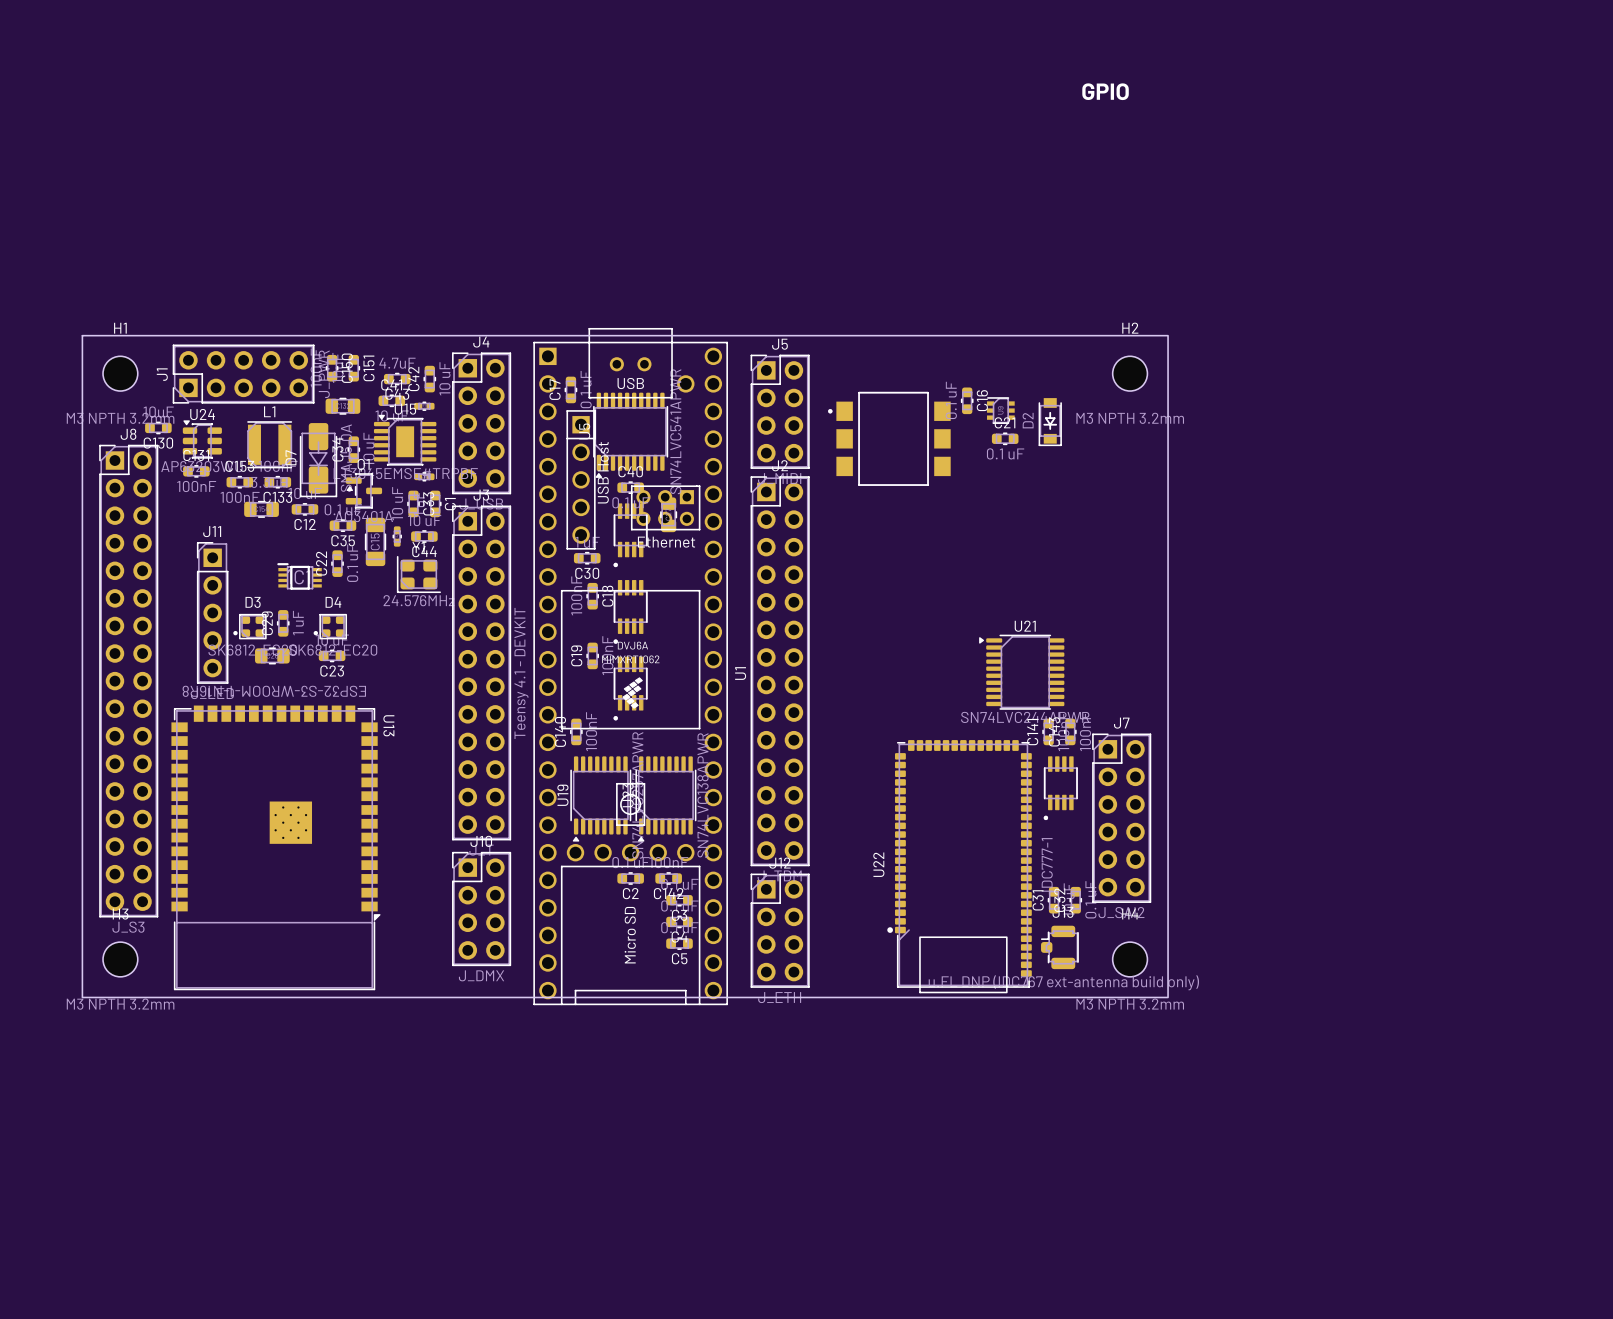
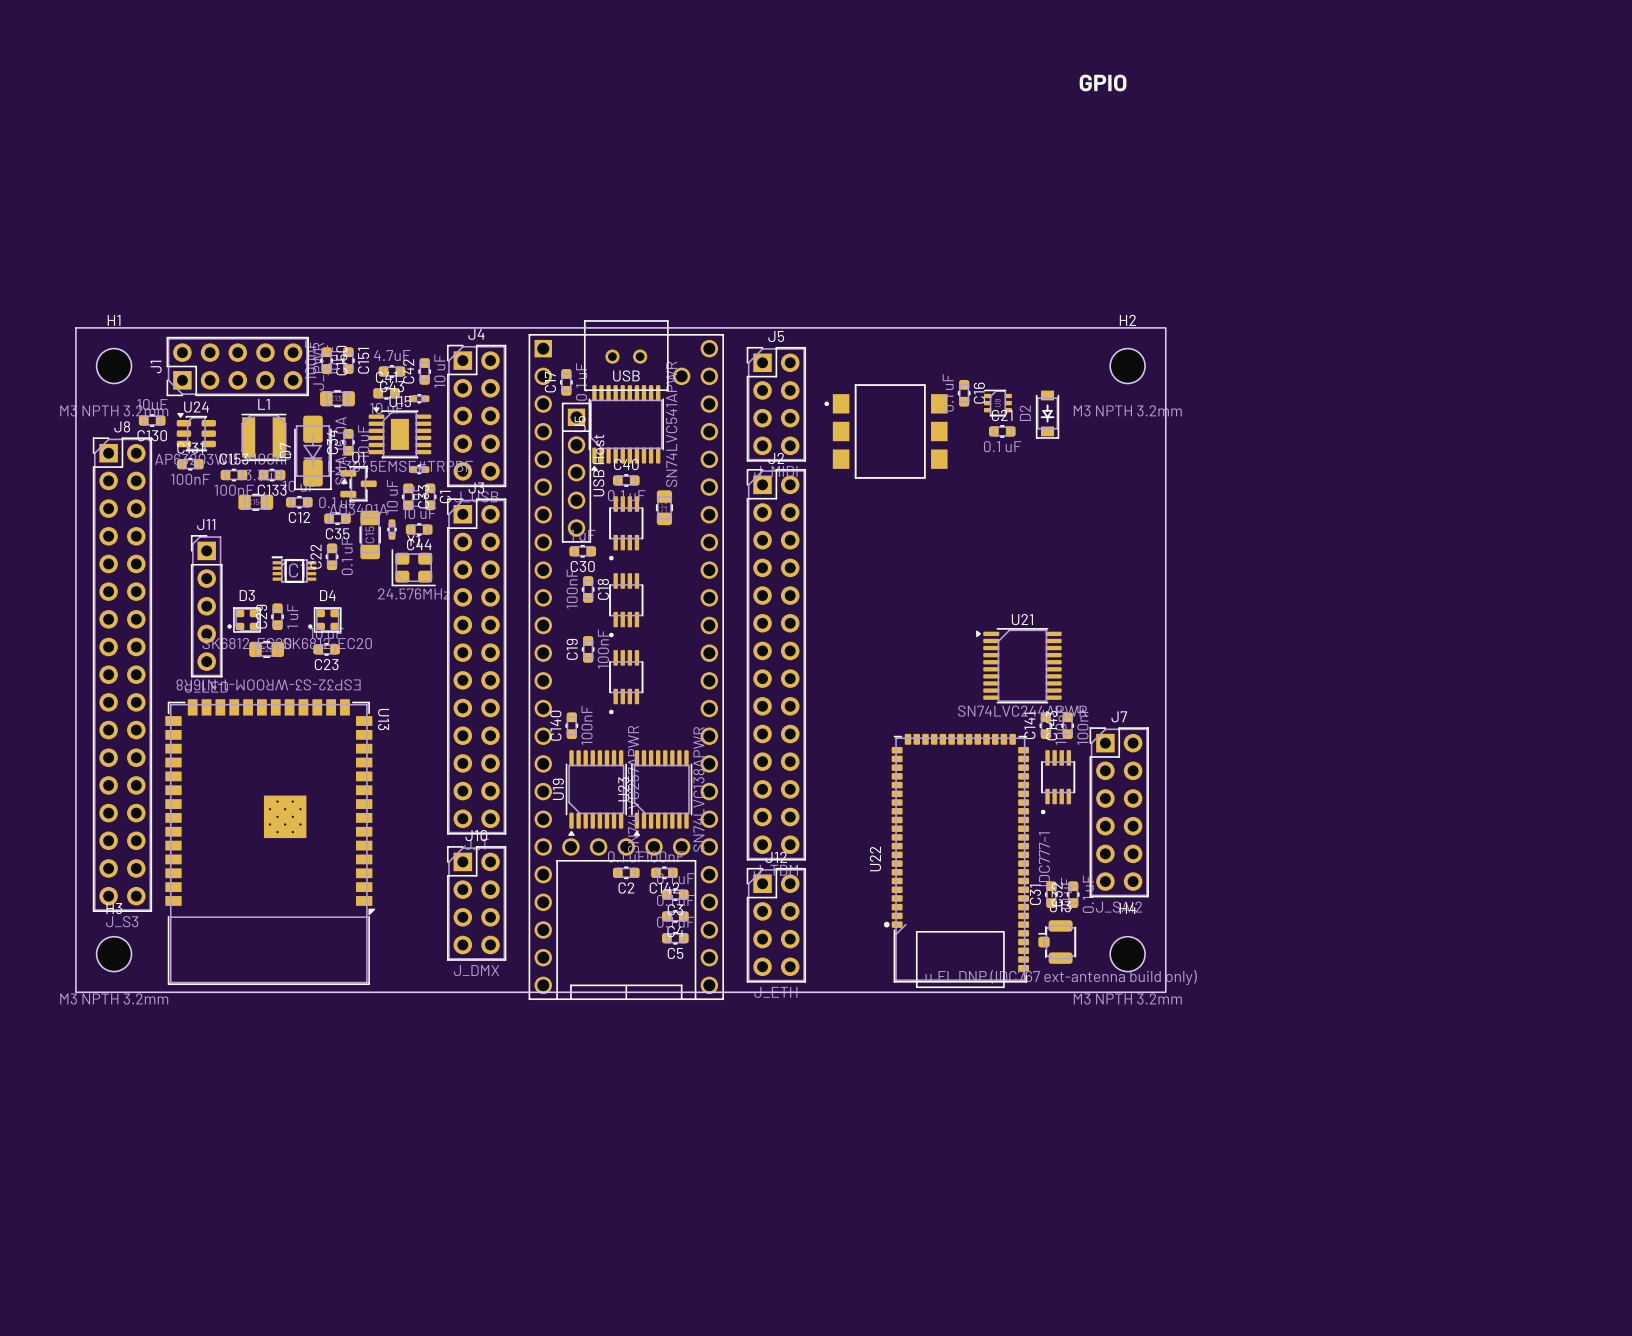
U1: Teensy 4.1 - DEVKIT (630, 666) -> none
part: none -> (626, 660)

